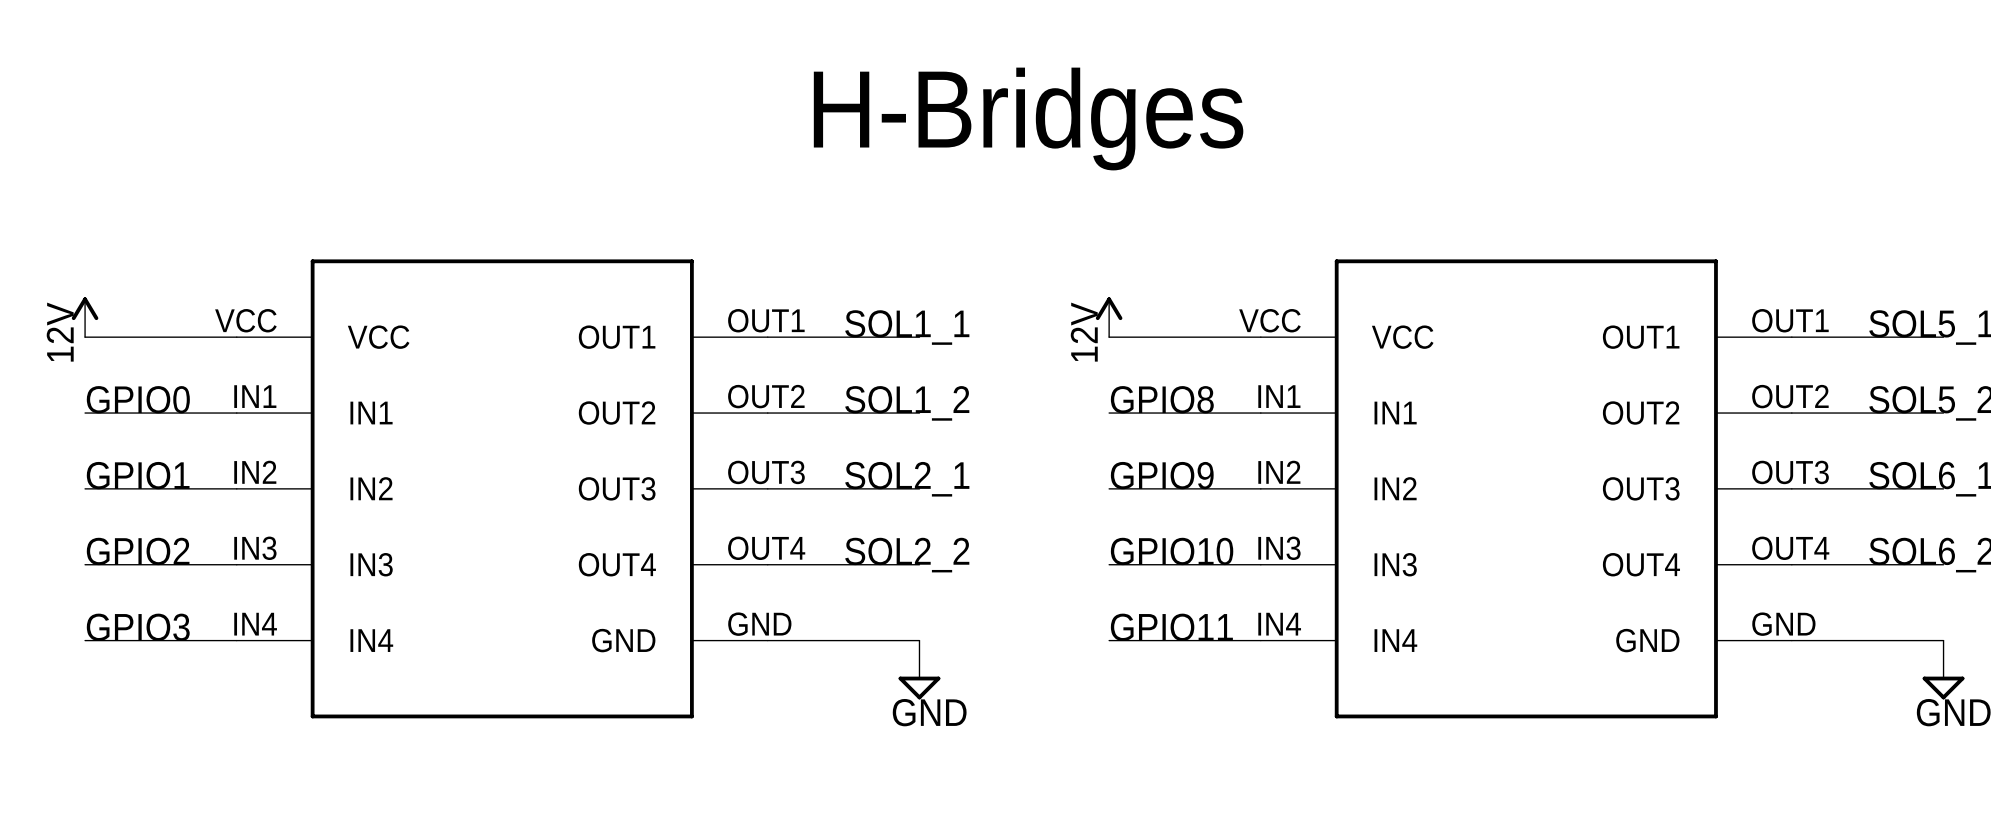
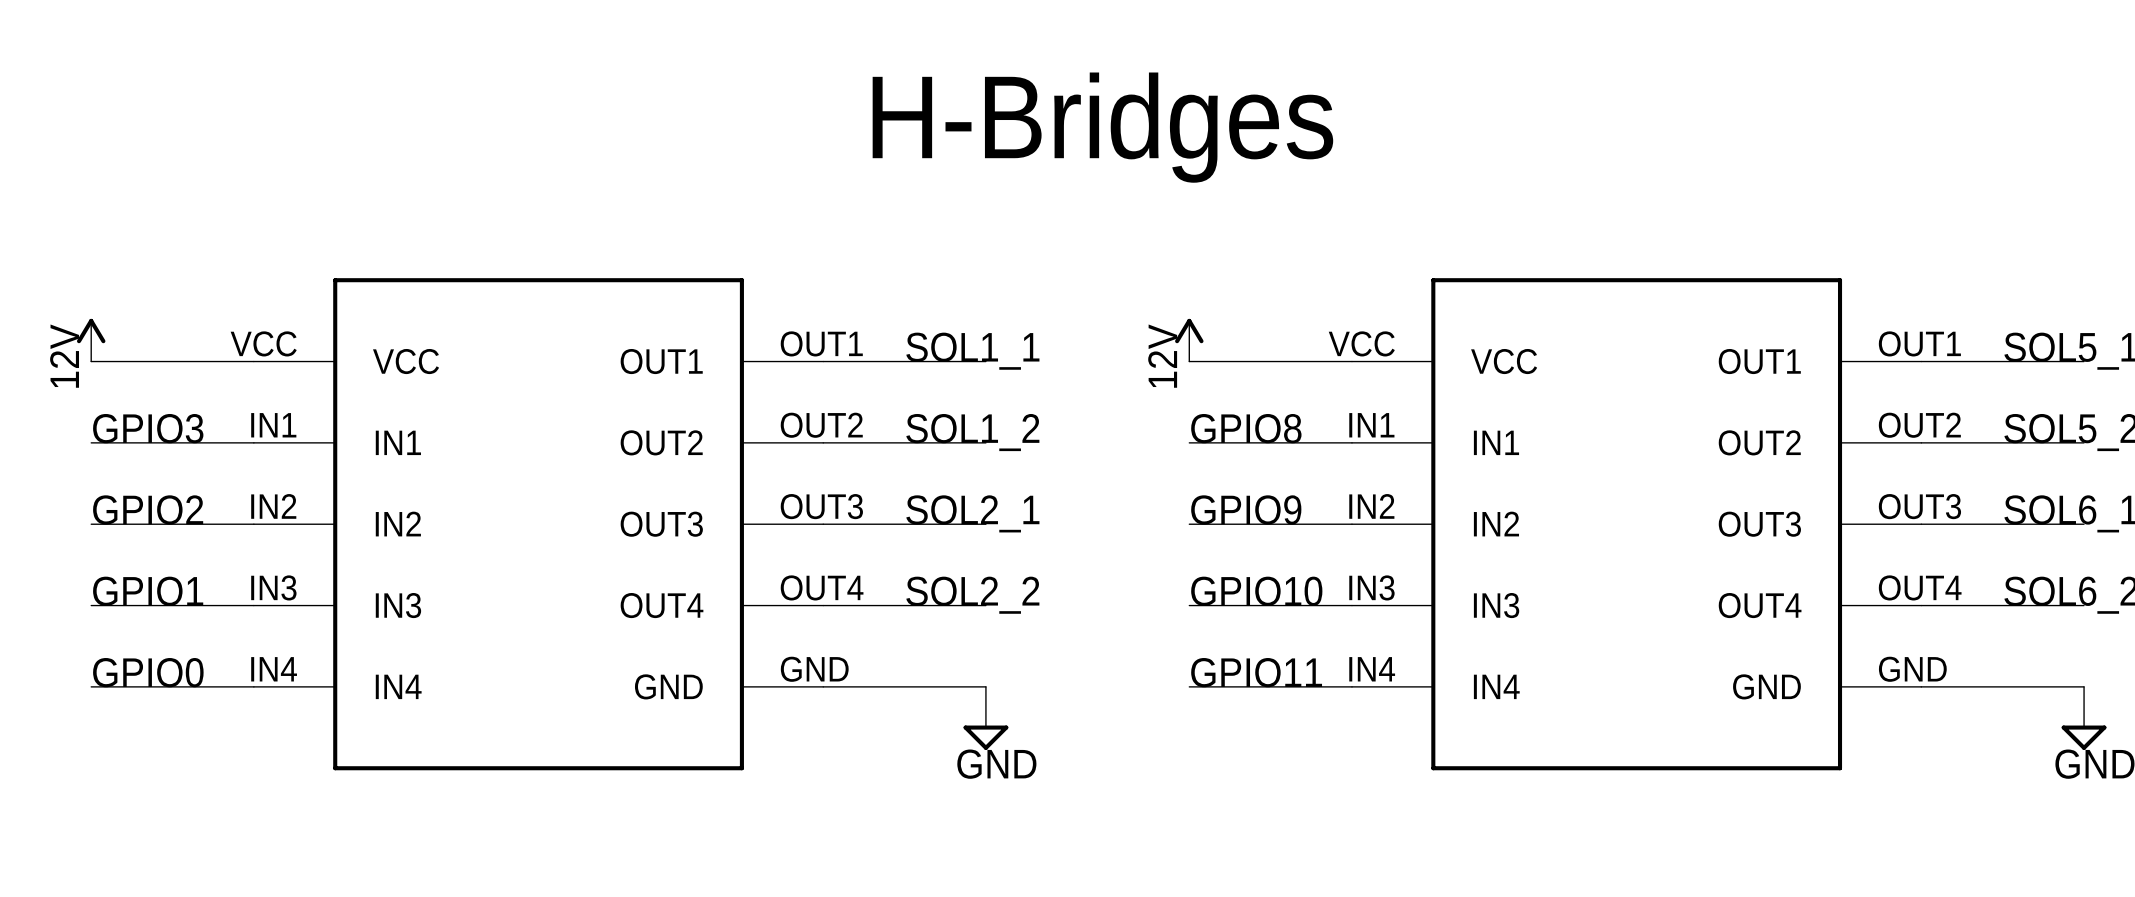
label: GPIO0 (138, 399) -> GPIO3 (148, 428)
label: GPIO1 (138, 475) -> GPIO2 (148, 509)
label: GPIO2 (138, 551) -> GPIO1 (148, 591)
label: GPIO3 (138, 627) -> GPIO0 (148, 672)

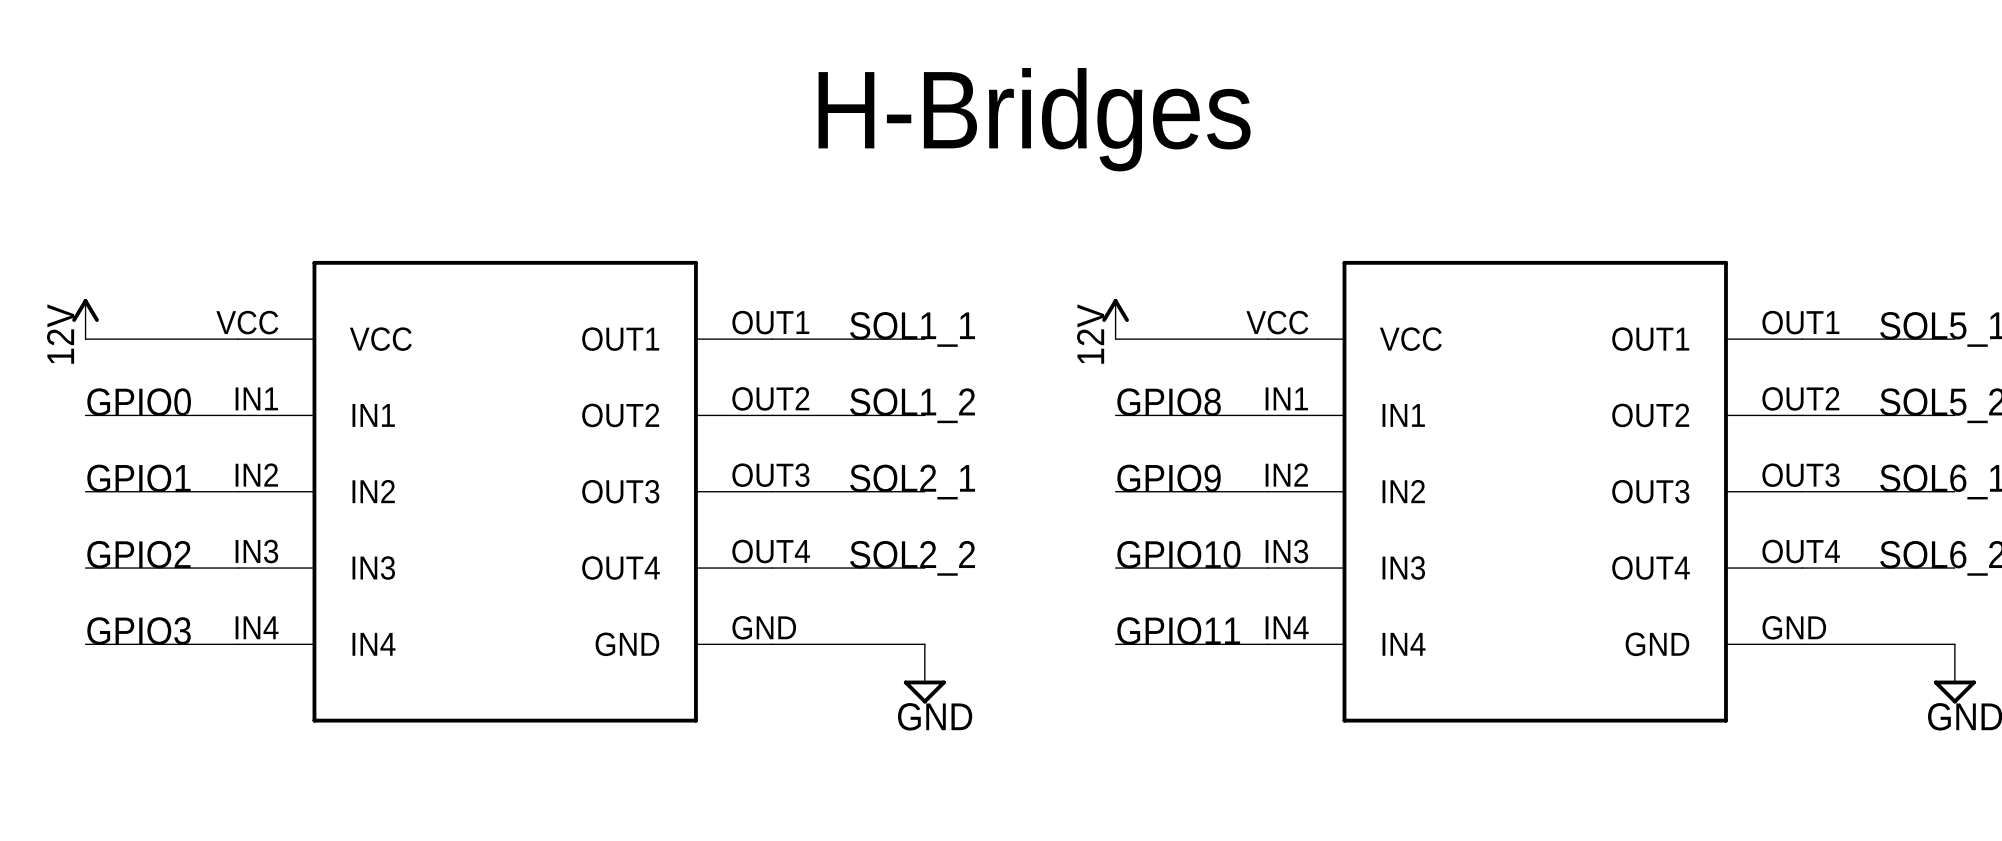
label: GPIO3 (148, 428) -> GPIO0 (139, 402)
label: GPIO2 (148, 509) -> GPIO1 (138, 478)
label: GPIO1 (148, 591) -> GPIO2 (138, 554)
label: GPIO0 (148, 672) -> GPIO3 (139, 630)

